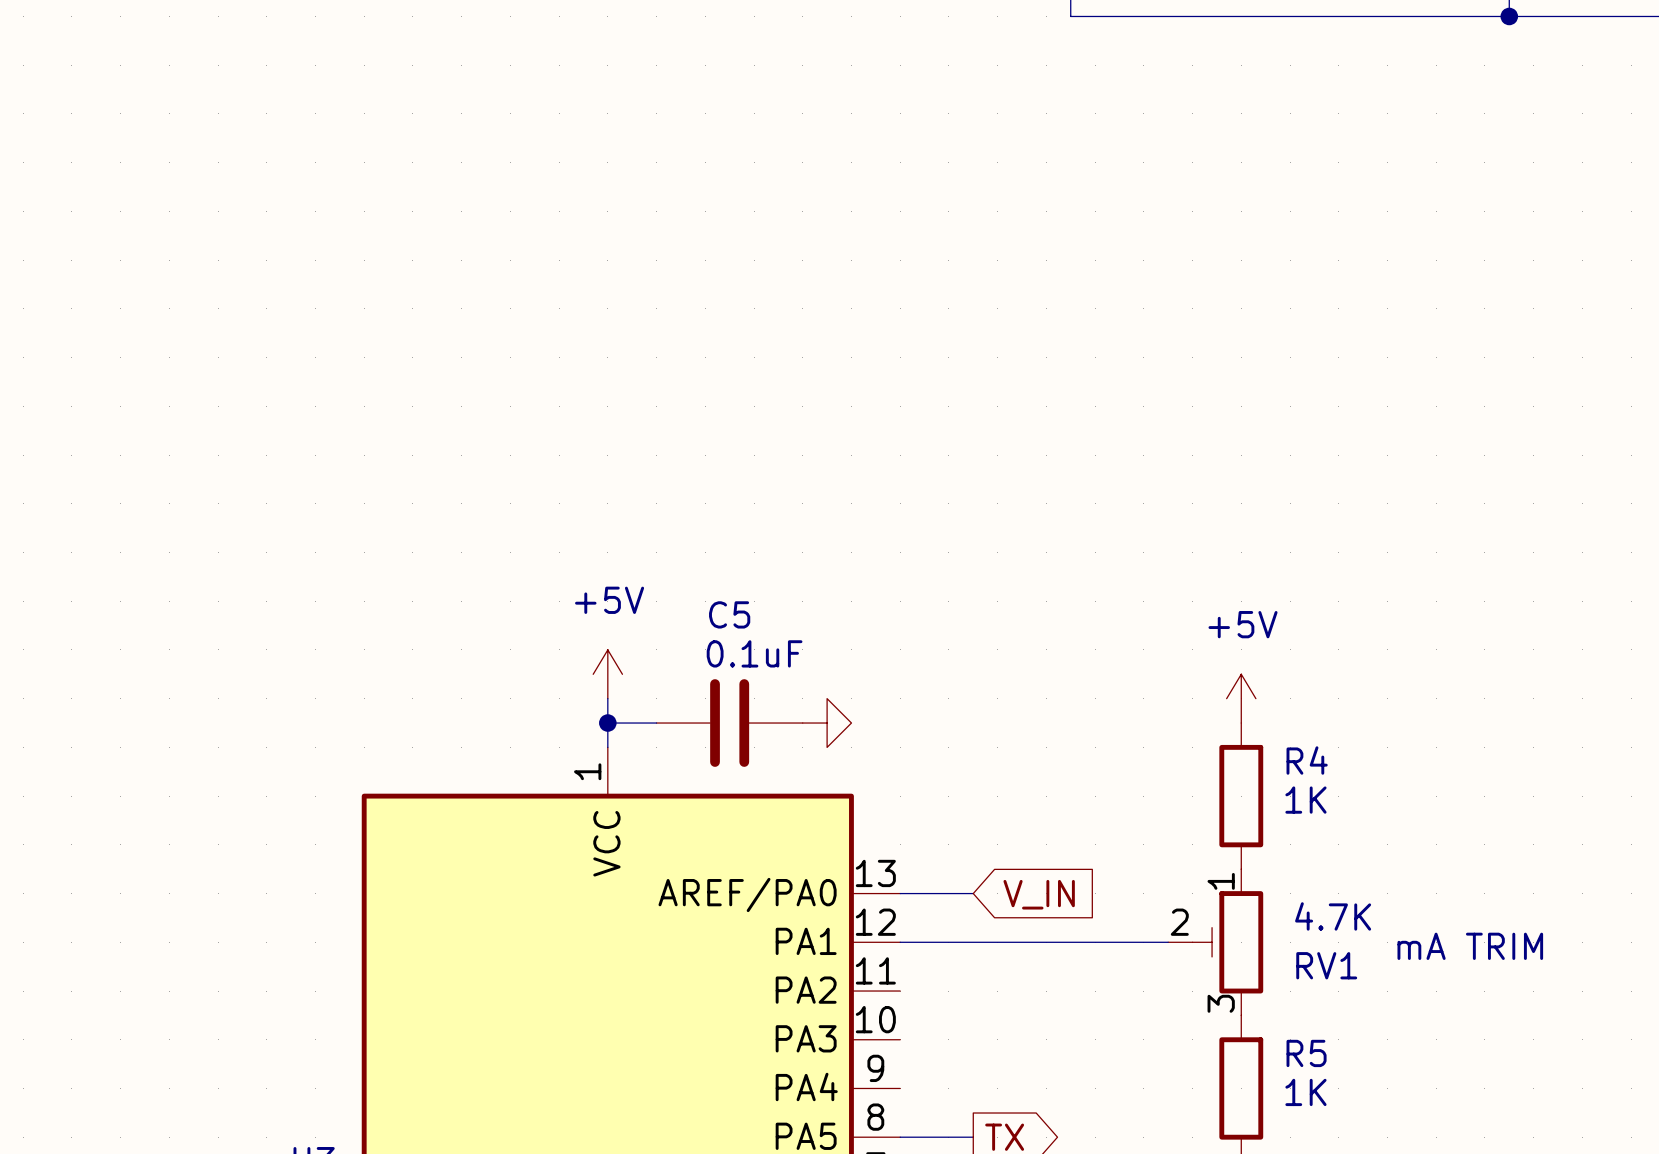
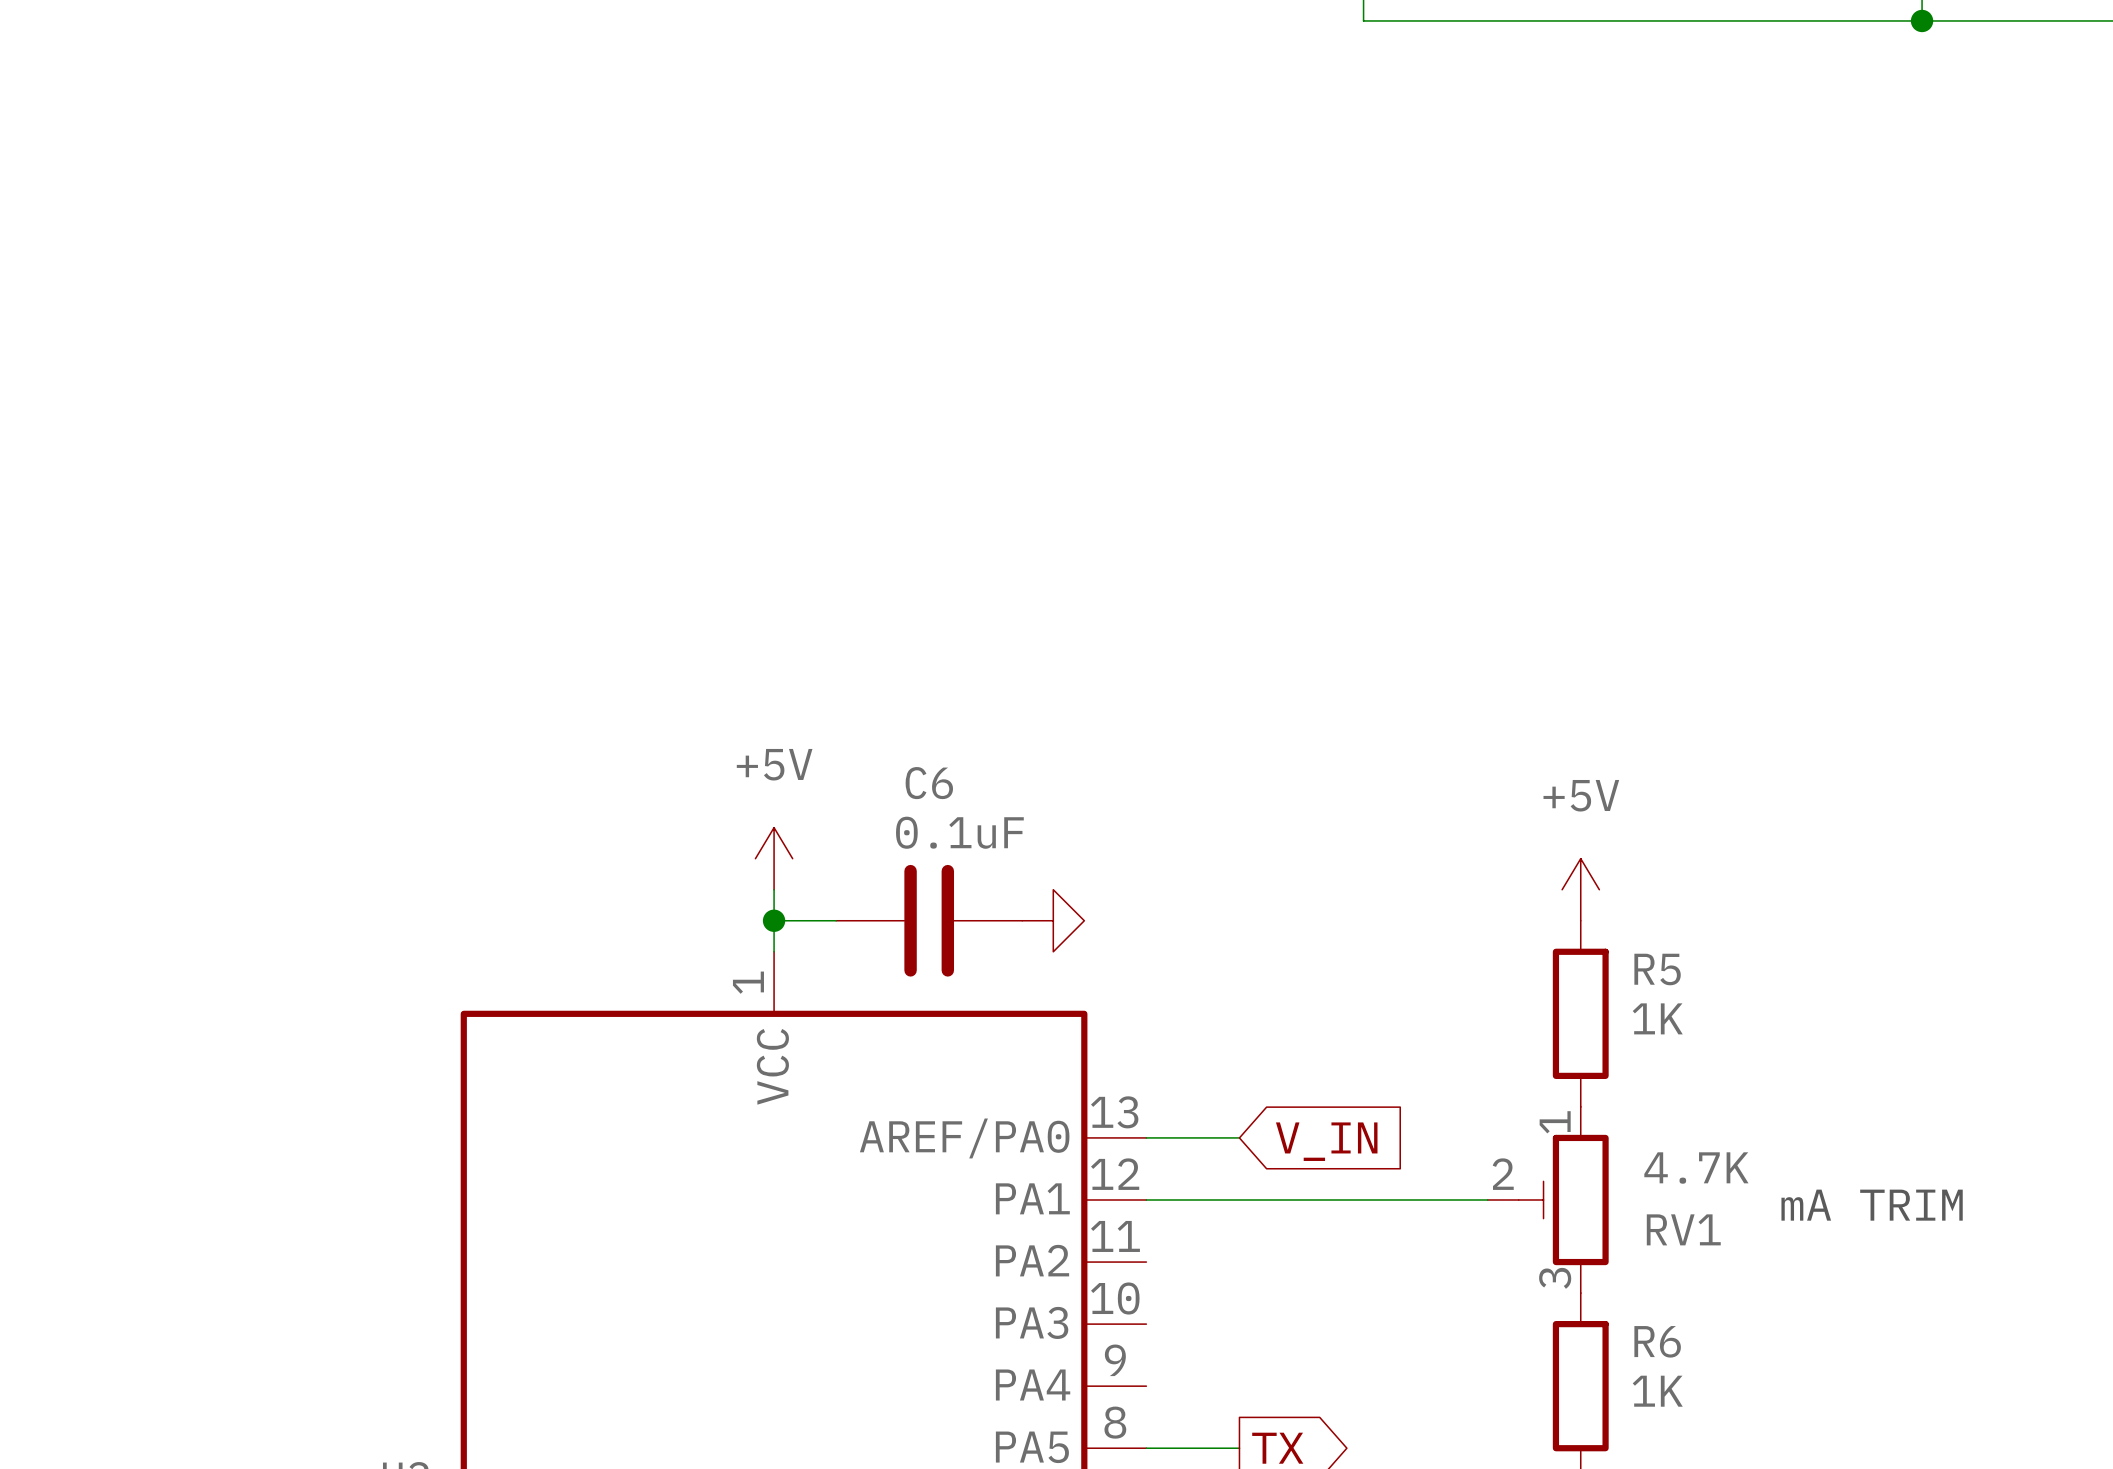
C5 name: C5 (729, 614) -> C6 (929, 783)
R4 name: R4 (1307, 760) -> R5 (1657, 969)
R5 name: R5 (1306, 1053) -> R6 (1657, 1341)

